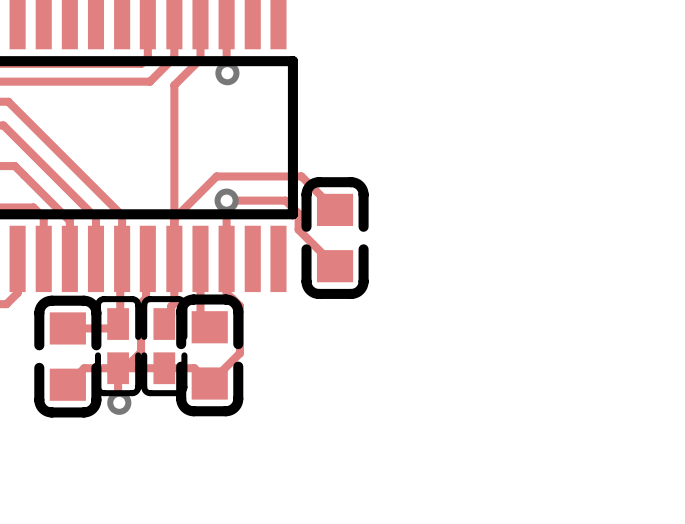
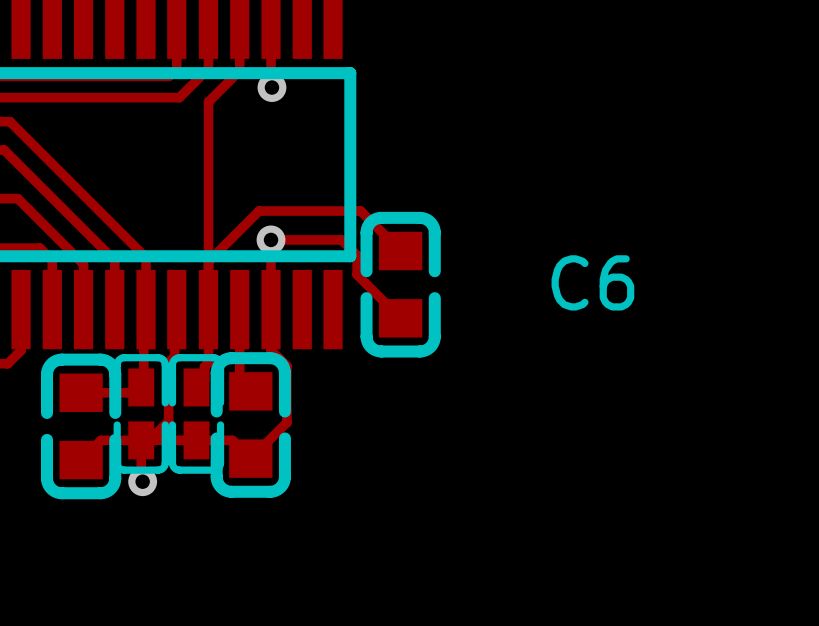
C6 name: none -> C6 (592, 282)

